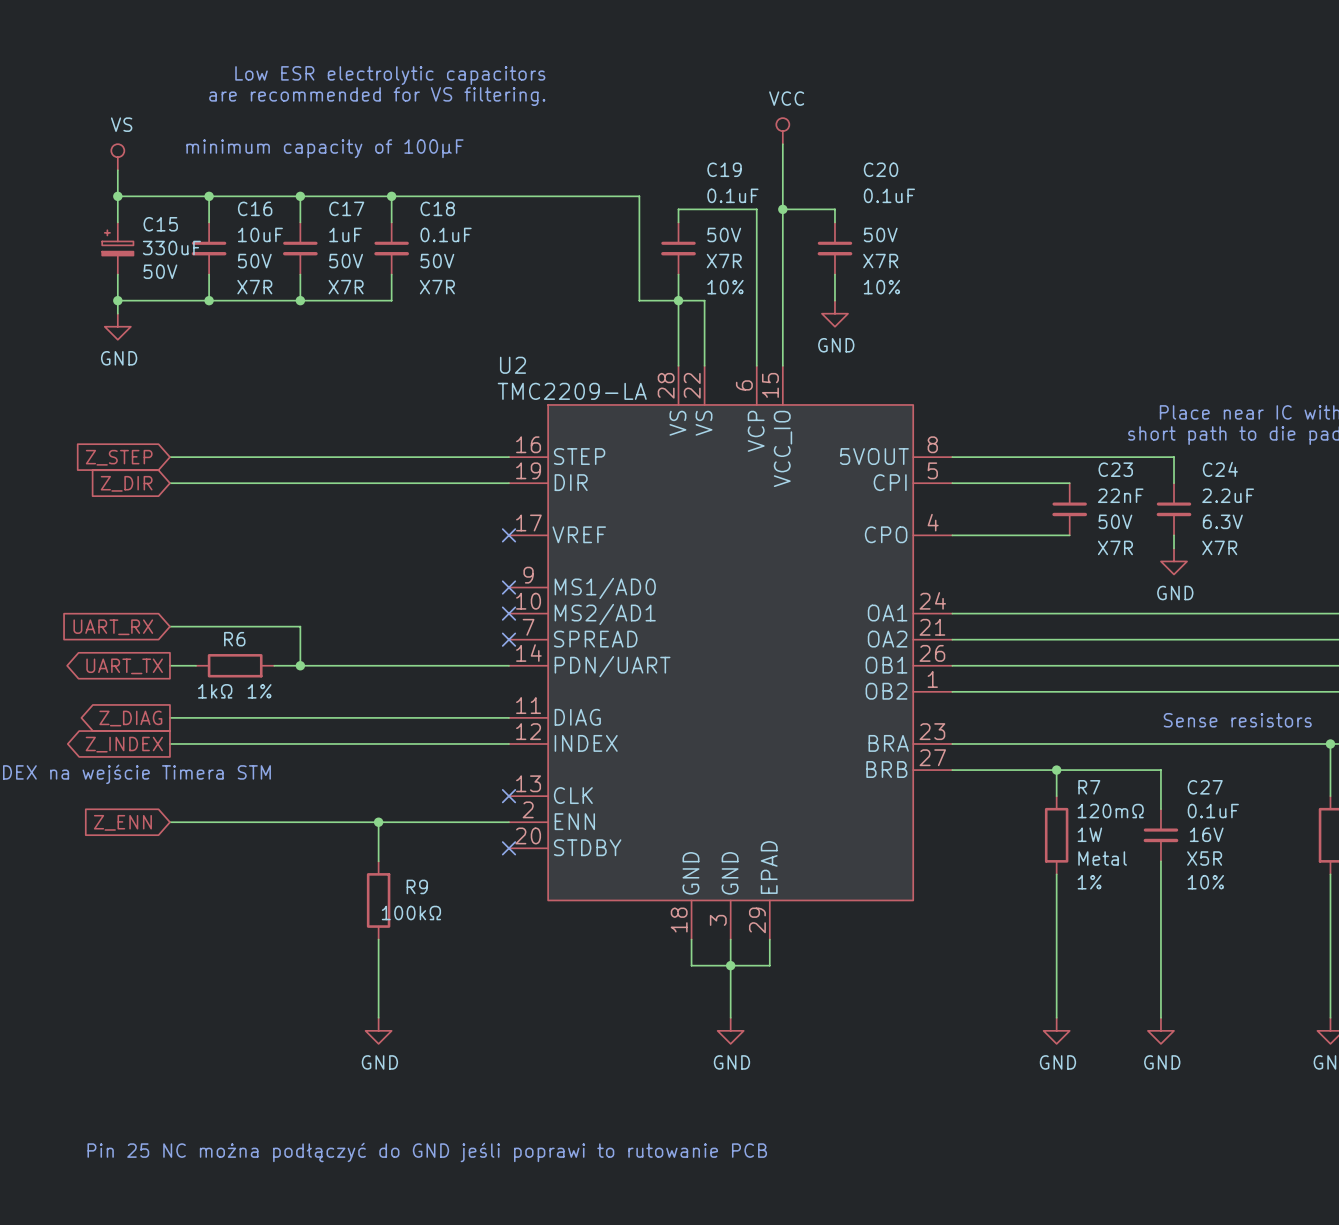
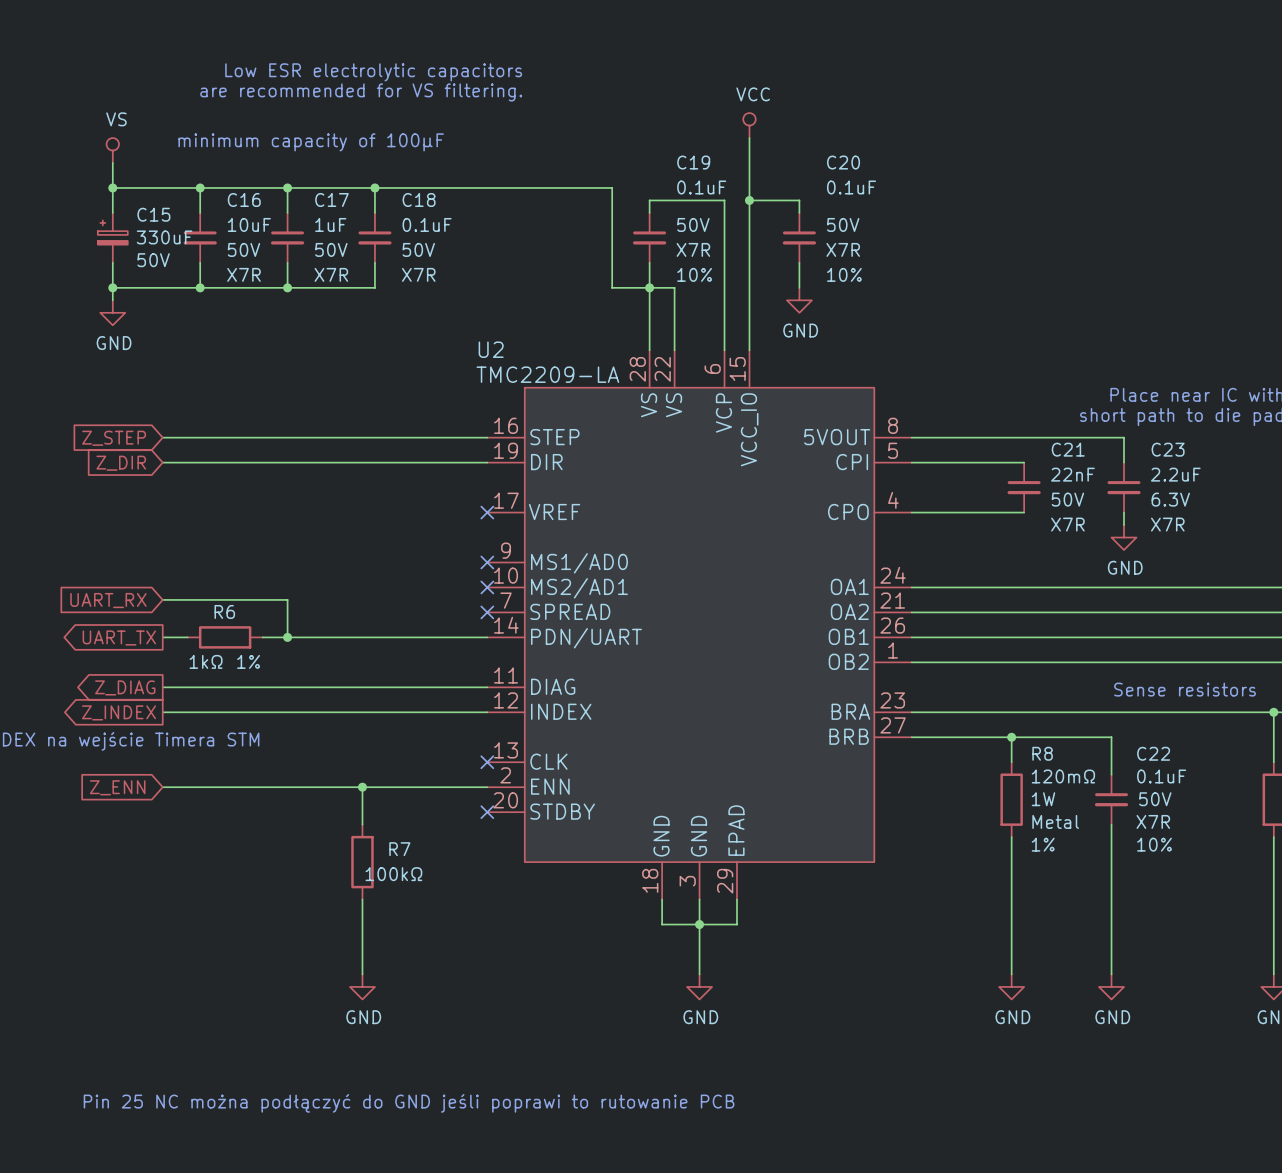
C23 name: C23 (1115, 469) -> C21 (1068, 449)
C24 name: C24 (1220, 469) -> C23 (1168, 449)
R7 name: R7 (1089, 787) -> R8 (1042, 753)
C27 name: C27 (1205, 787) -> C22 (1153, 753)
C27 text: 16V (1206, 834) -> 50V (1155, 799)
C27 text: X5R (1204, 858) -> X7R (1153, 821)
R9 name: R9 (417, 886) -> R7 (399, 849)

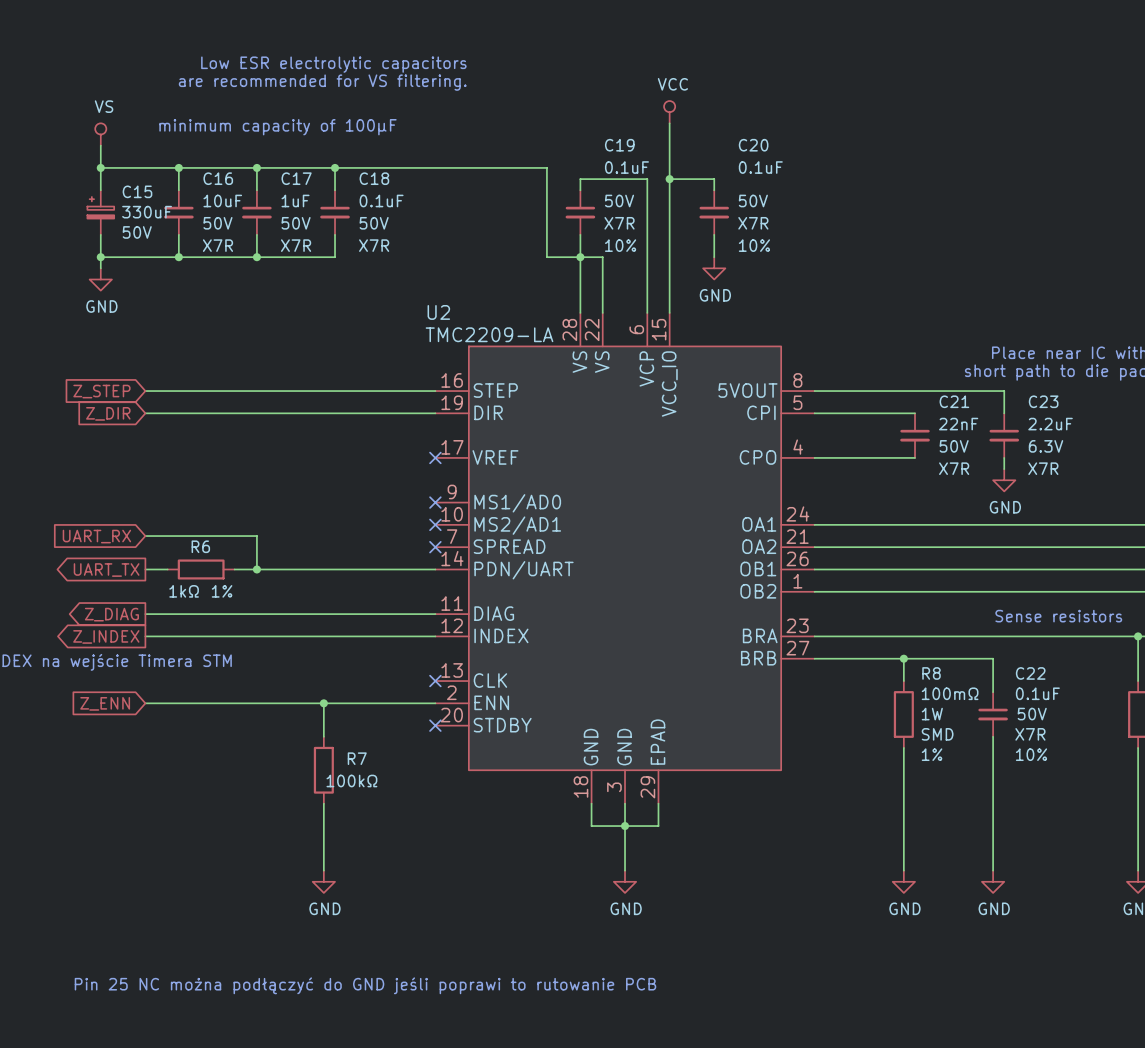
R8 value: 120mΩ (1063, 776) -> 100mΩ (950, 693)
R8 text: Metal (1055, 821) -> SMD (937, 734)

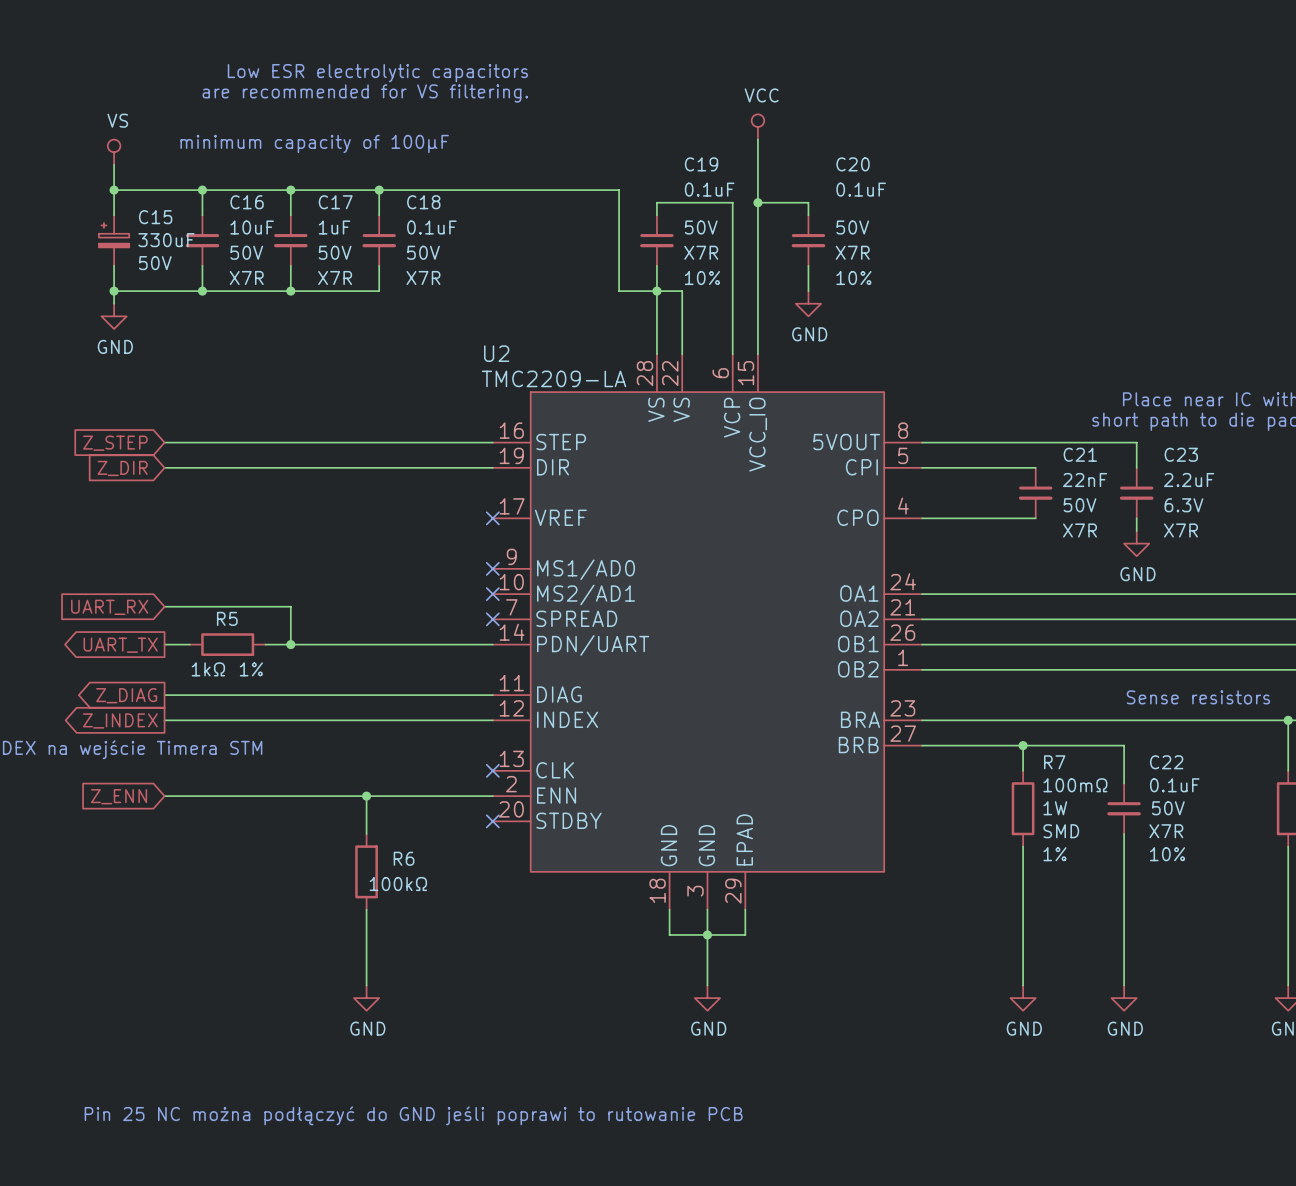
R6 name: R6 (200, 546) -> R5 (227, 618)
R8 name: R8 (931, 673) -> R7 (1054, 762)
R7 name: R7 (357, 758) -> R6 (404, 858)

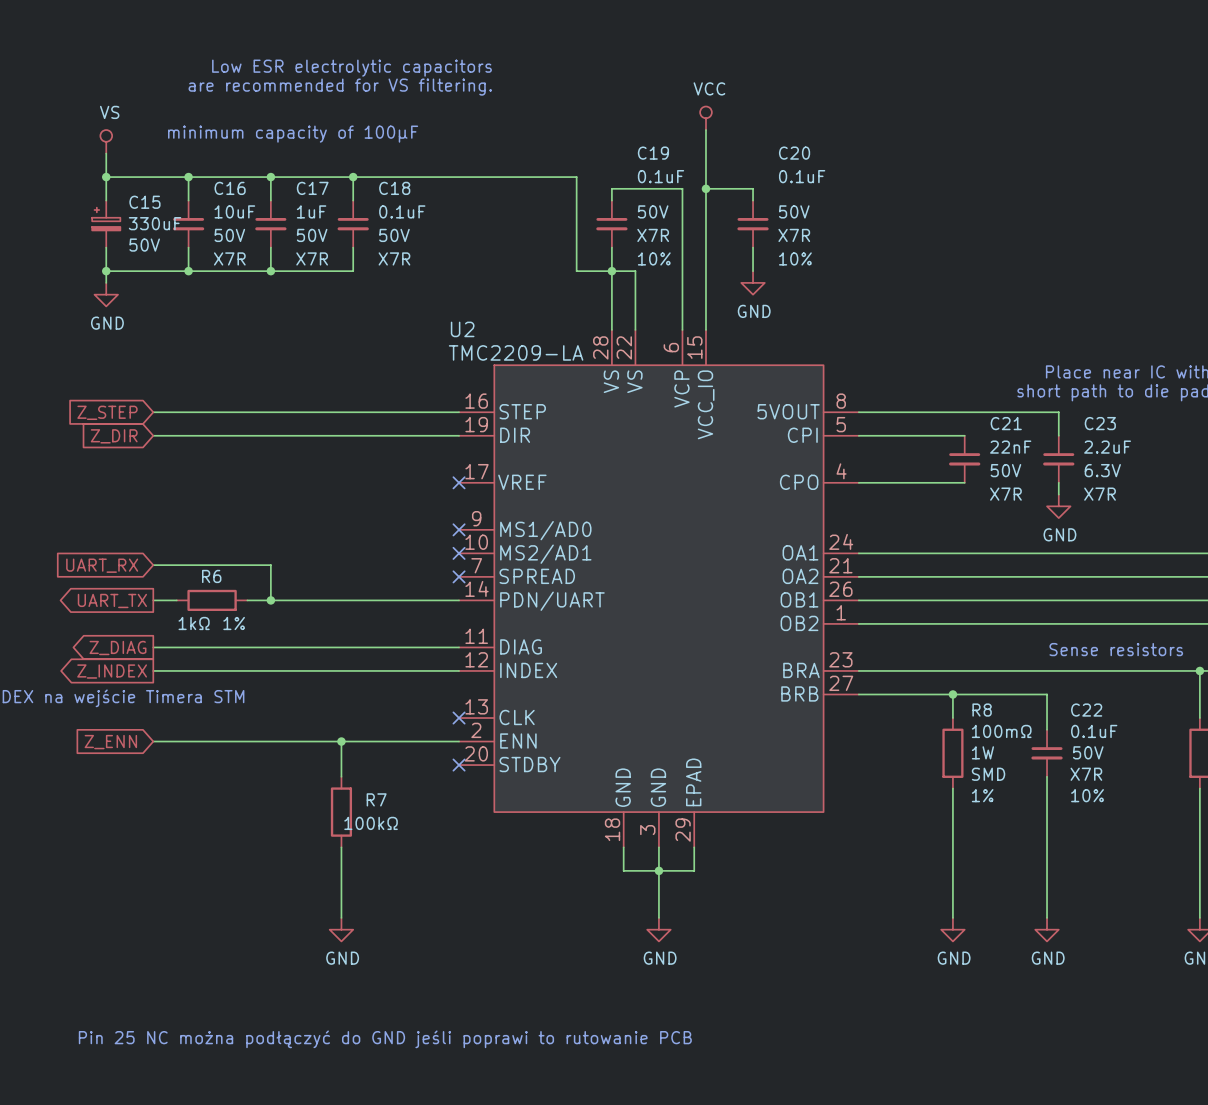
R5 name: R5 (227, 618) -> R6 (211, 576)
R7 name: R7 (1054, 762) -> R8 (982, 710)
R6 name: R6 (404, 858) -> R7 (376, 799)

